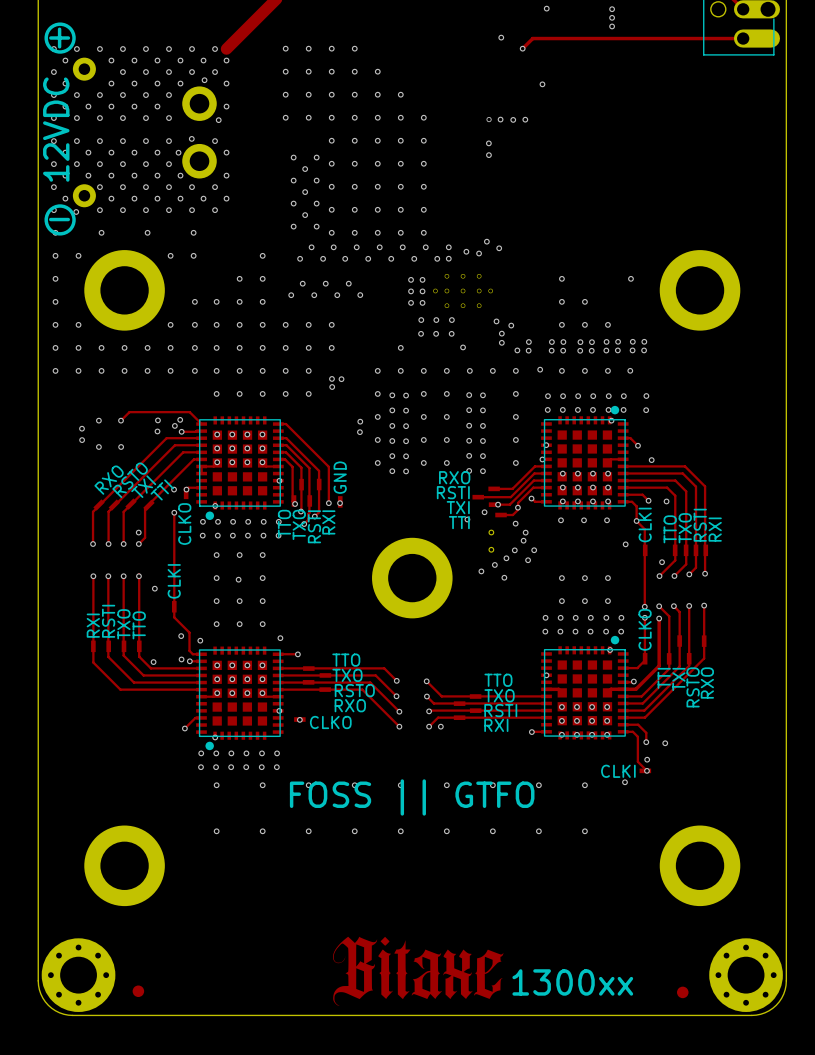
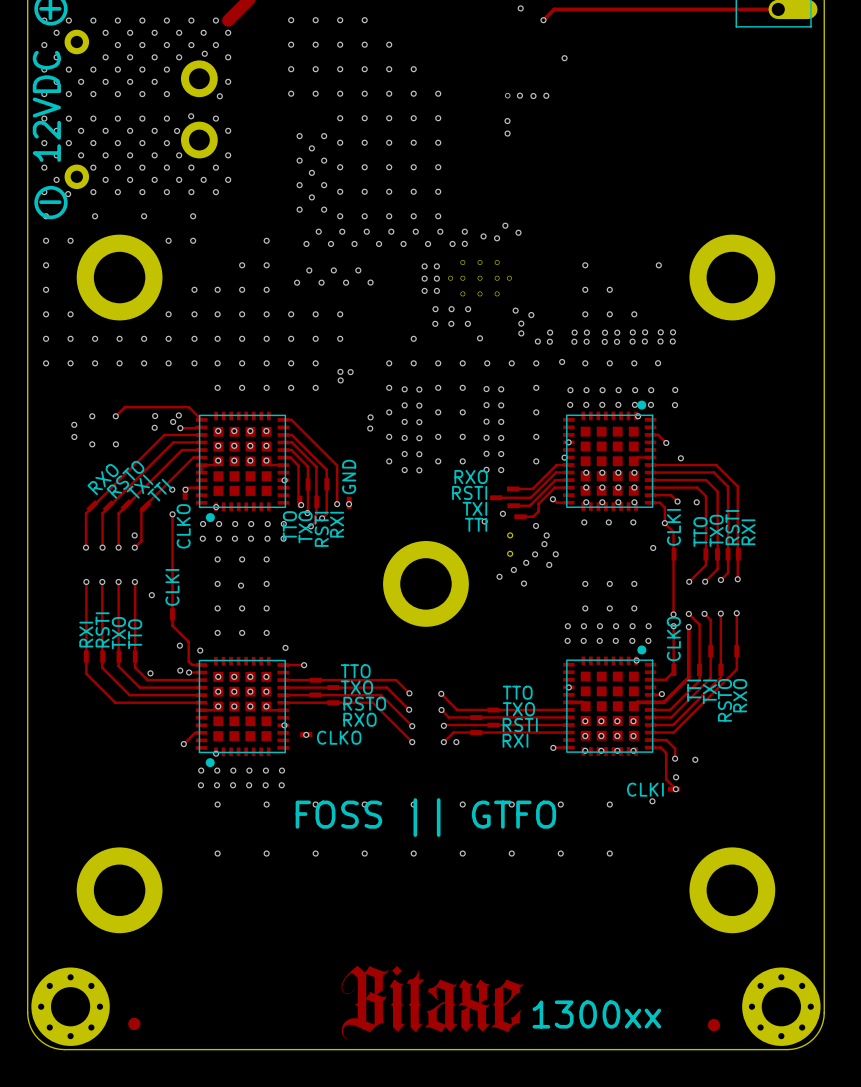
via: (498, 504) -> none
via: (517, 507) -> none
via: (662, 562) -> none

